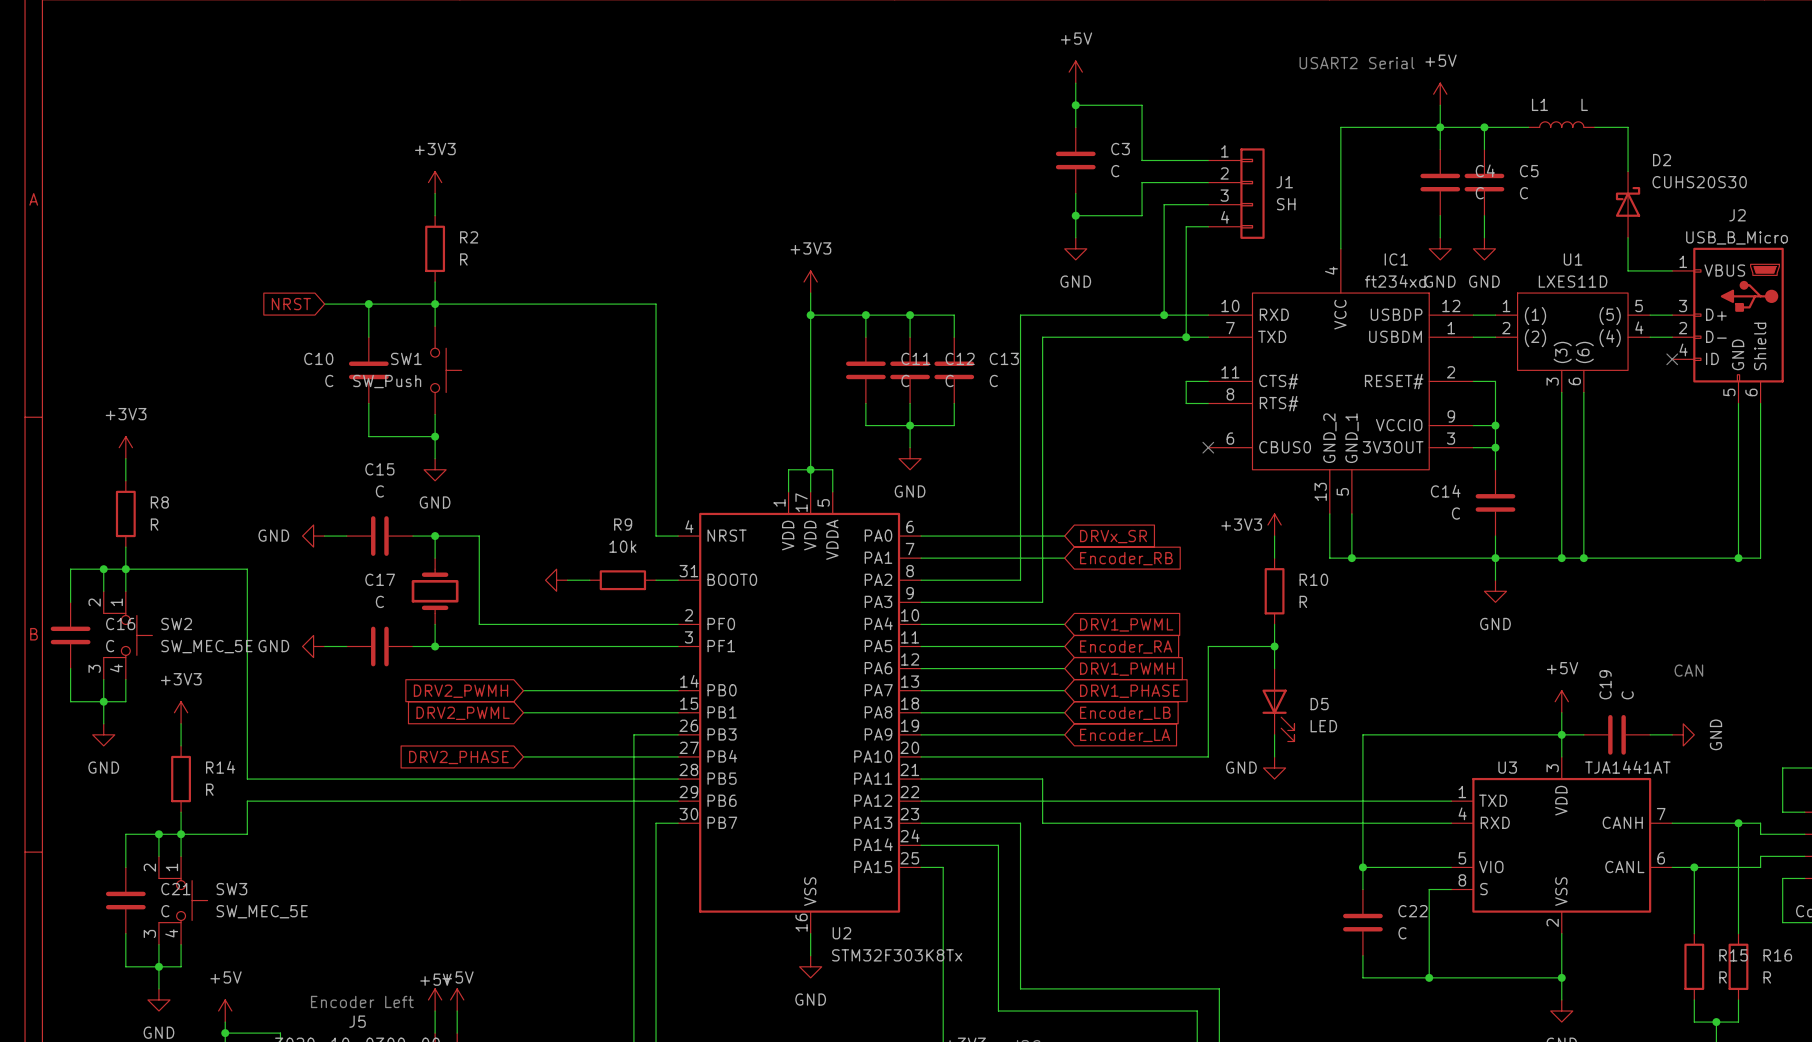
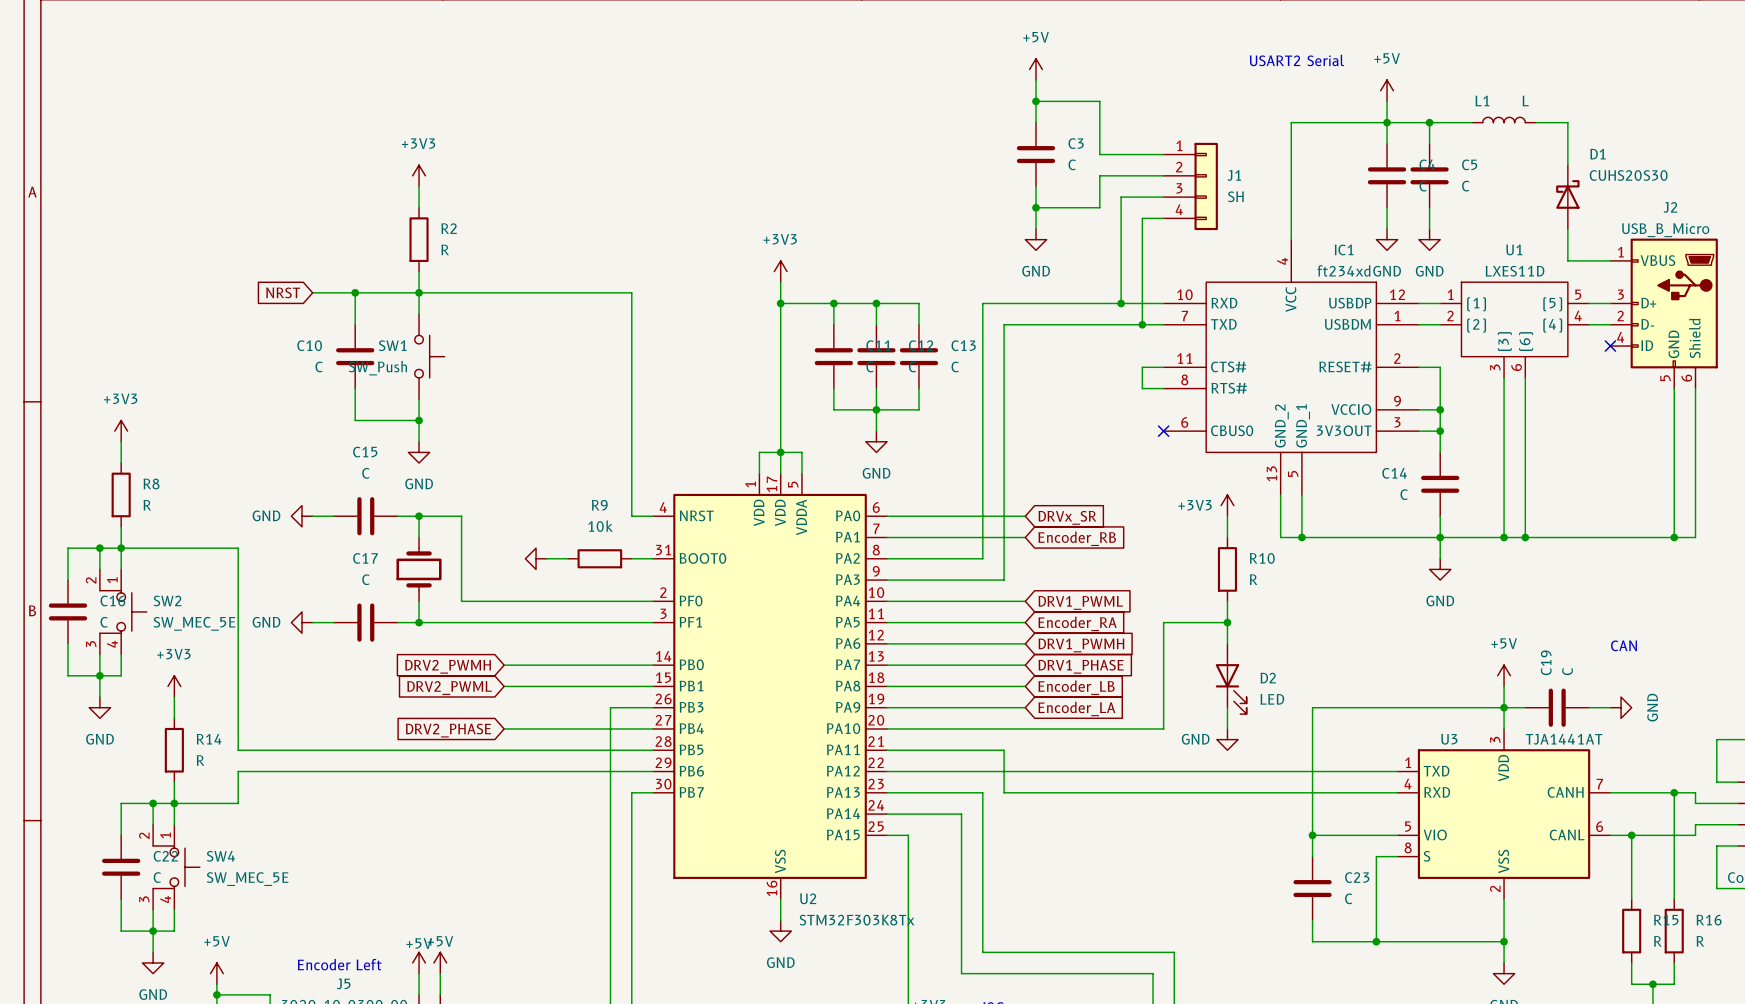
D2 name: D2 (1662, 160) -> D1 (1597, 154)
D5 name: D5 (1319, 704) -> D2 (1268, 678)
C21 name: C21 (175, 889) -> C22 (165, 856)
SW3 name: SW3 (231, 889) -> SW4 (220, 856)
C22 name: C22 (1412, 911) -> C23 (1357, 877)

